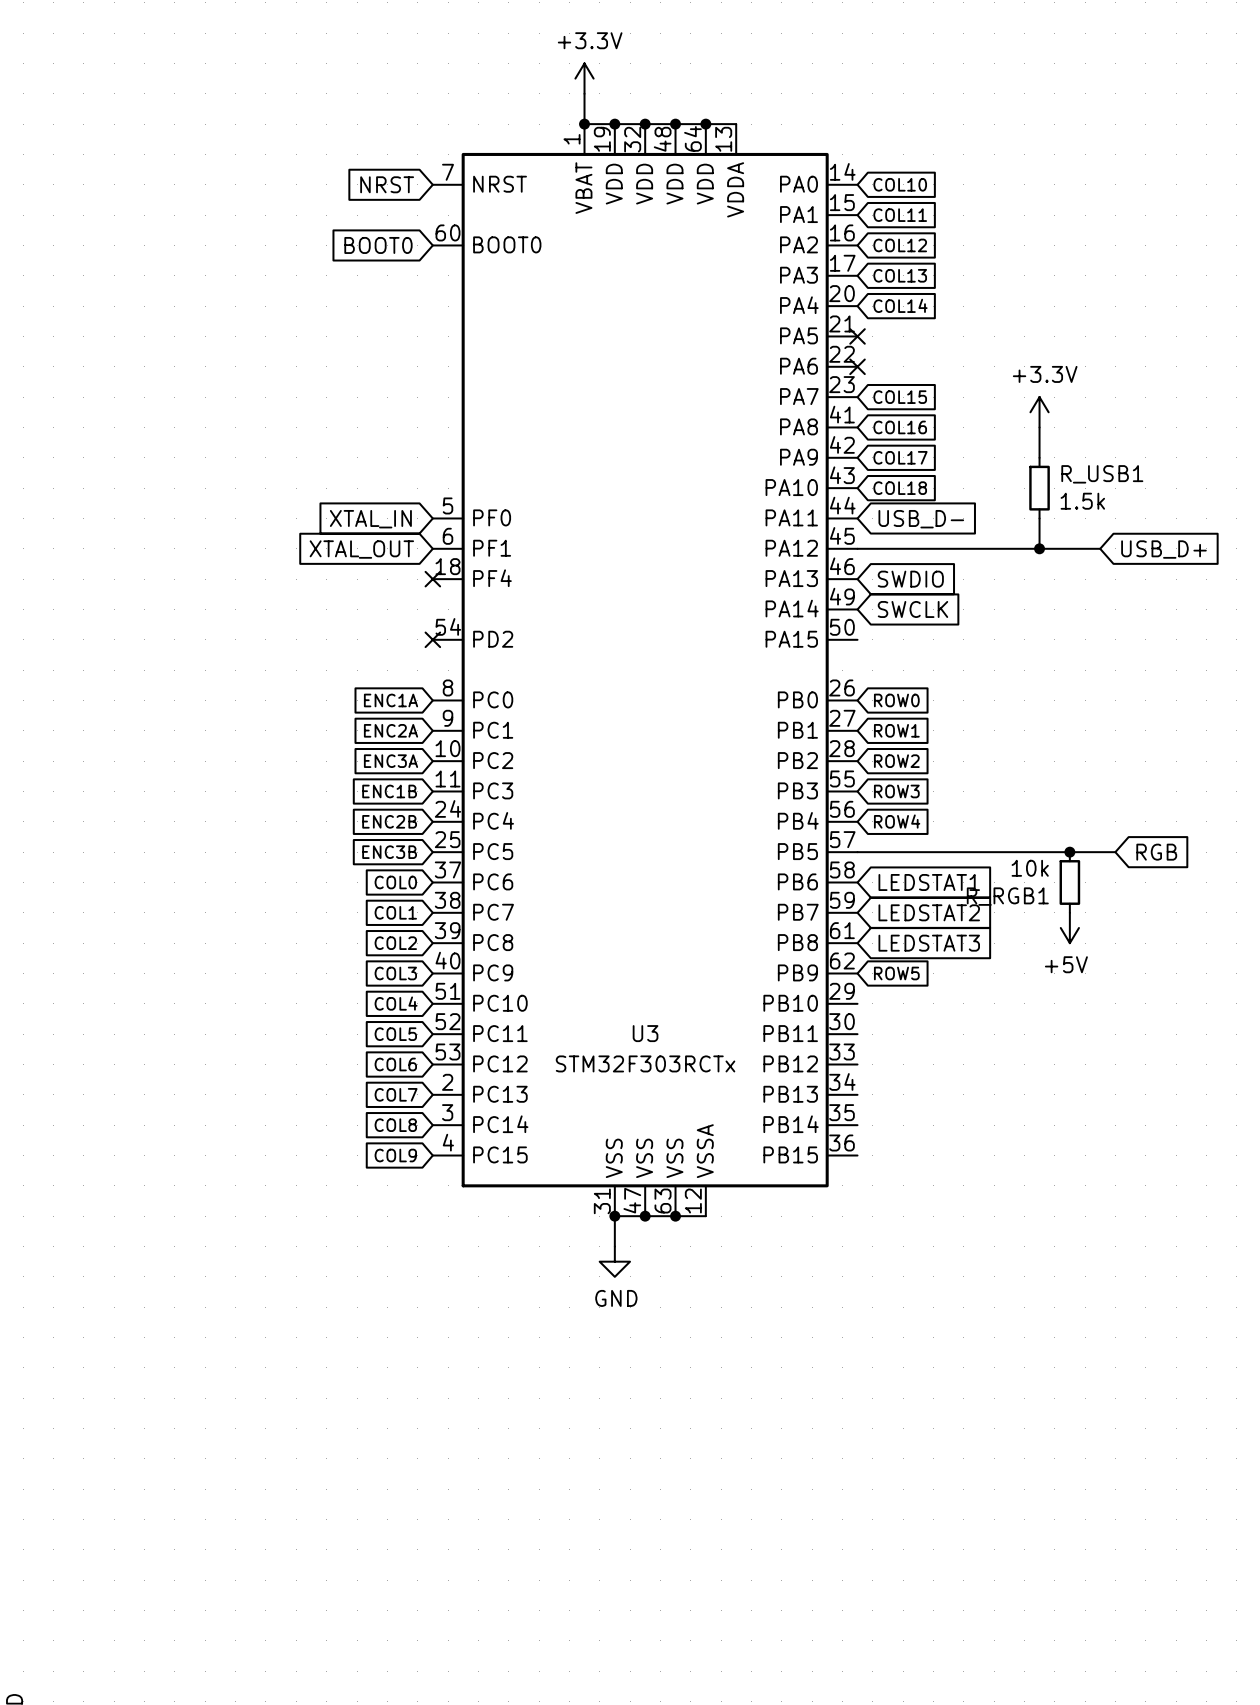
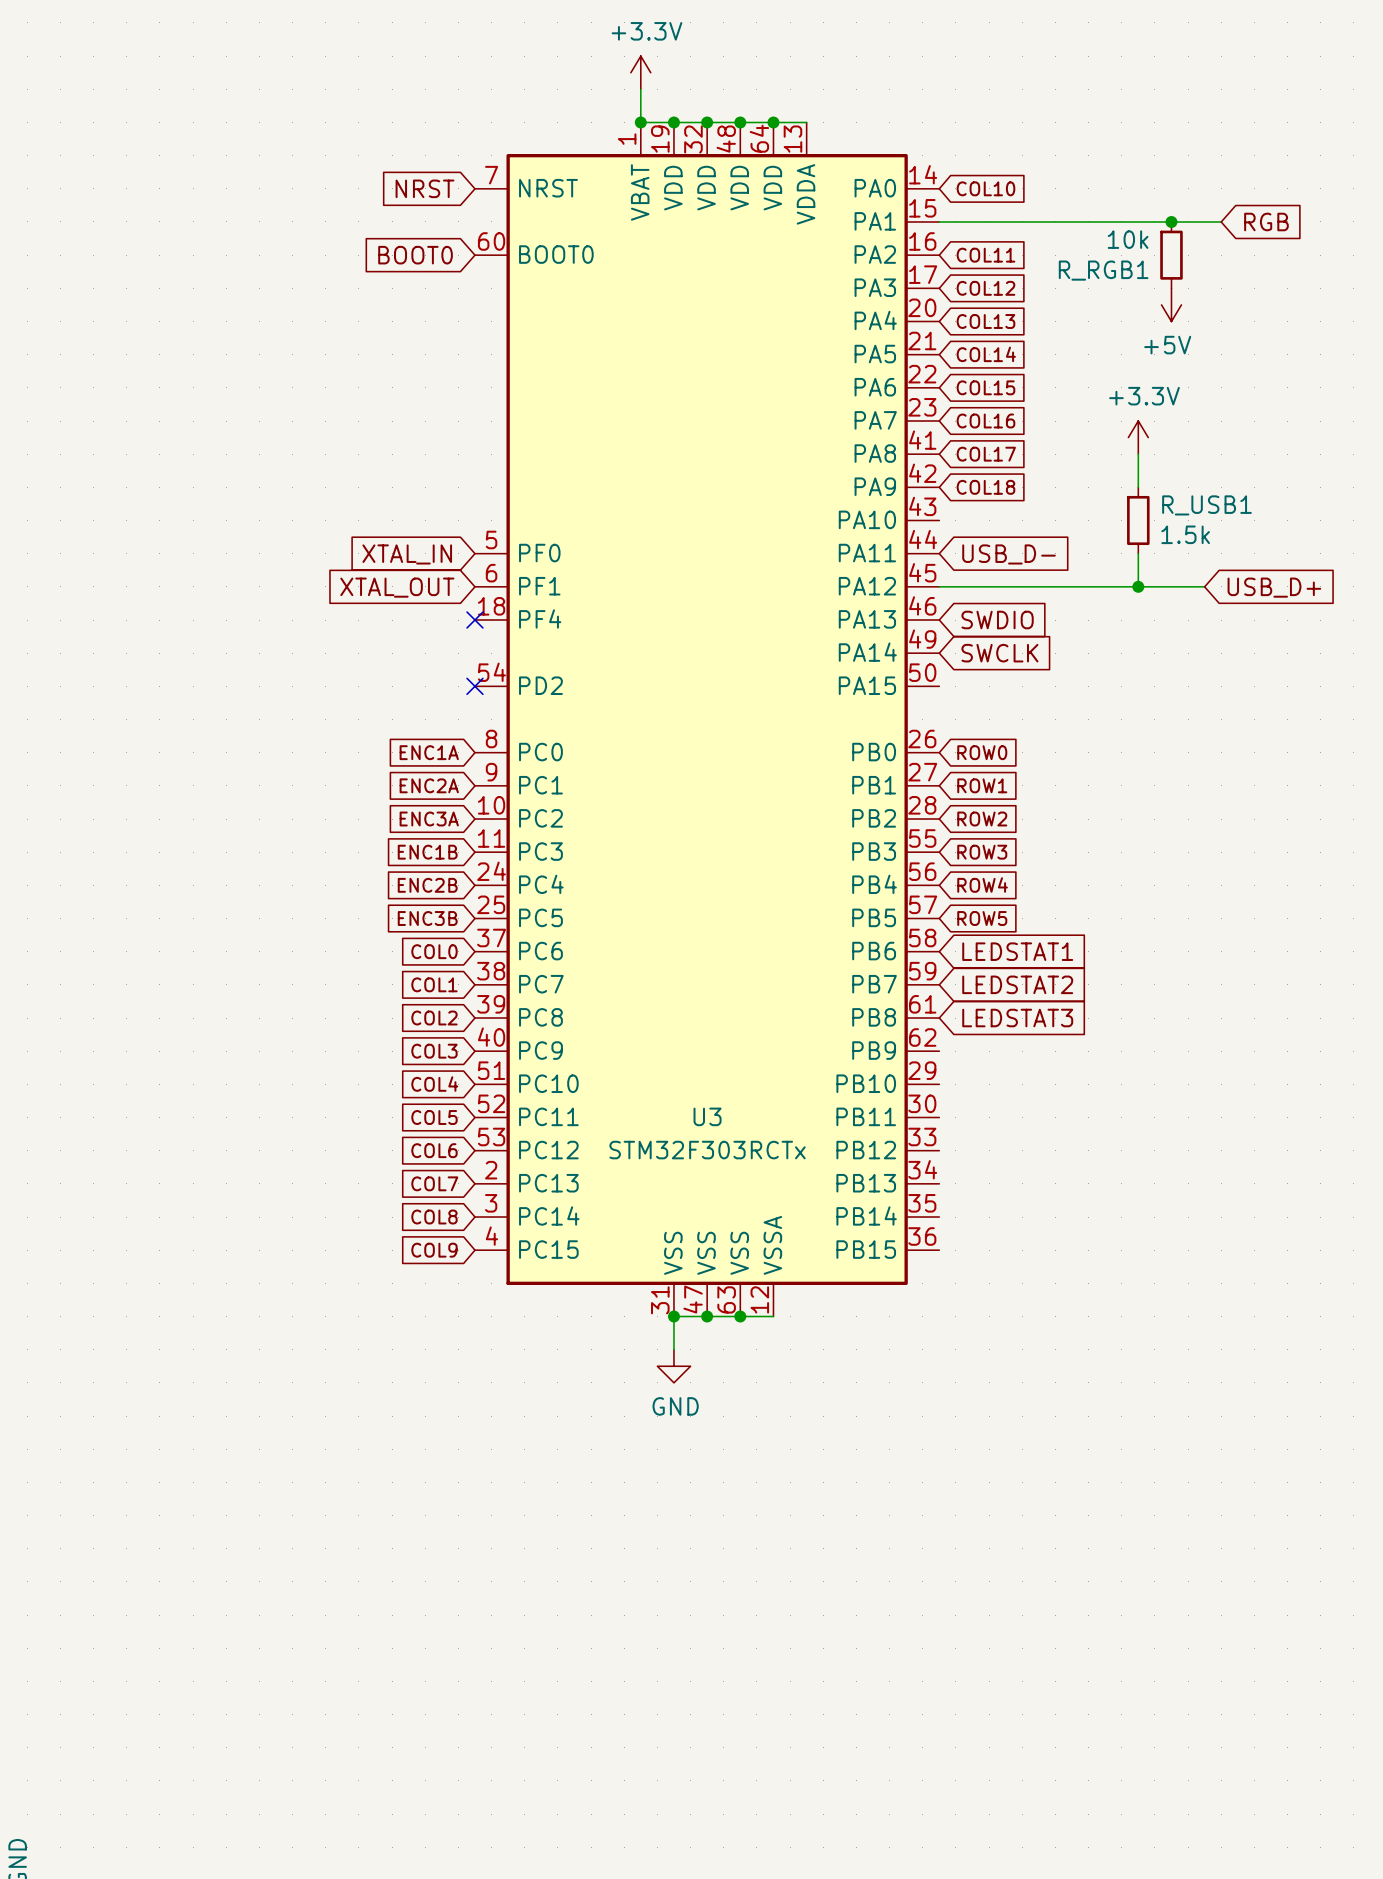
wire: none -> (939, 221) (1221, 221)
global label: COL11 (900, 215) -> none
junction: none -> (1171, 221)
global label: none -> RGB (1266, 221)
global label: COL12 (900, 245) -> COL11 (985, 255)
global label: COL13 (900, 275) -> COL12 (985, 288)
power symbol: none -> +5V (1171, 304)
global label: COL14 (900, 305) -> COL13 (985, 321)
no-connect mark: (857, 336) -> none
global label: none -> COL14 (986, 354)
no-connect mark: (857, 366) -> none
global label: none -> COL15 (985, 387)
global label: COL15 (900, 397) -> COL16 (985, 421)
global label: COL16 (900, 427) -> COL17 (986, 454)
global label: COL17 (900, 457) -> COL18 (985, 487)
global label: COL18 (900, 488) -> none
wire: (857, 852) (1115, 852) -> none
junction: (1069, 852) -> none
global label: RGB (1156, 852) -> none
R_RGB1 position: (1069, 882) -> (1171, 255)
power symbol: +5V (1069, 927) -> none
global label position: ROW5 (896, 973) -> ROW5 (982, 918)

